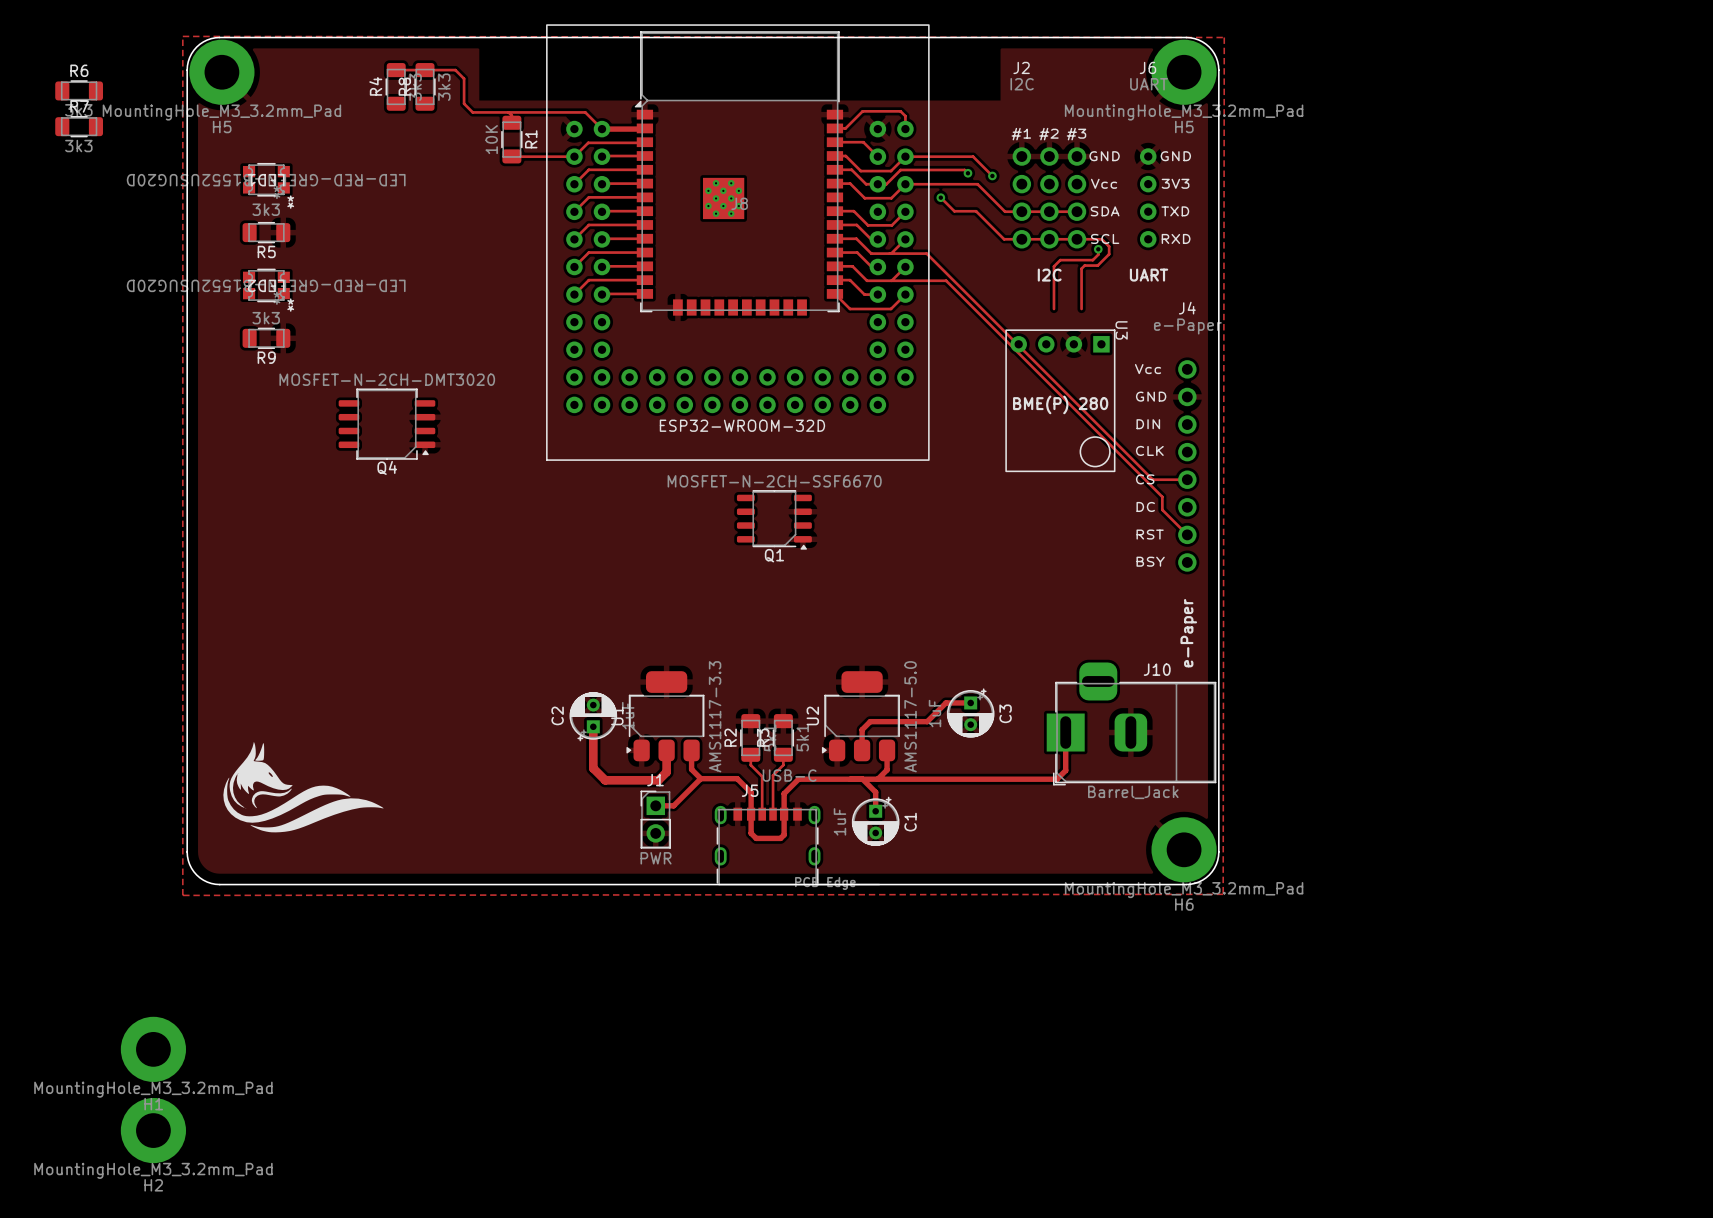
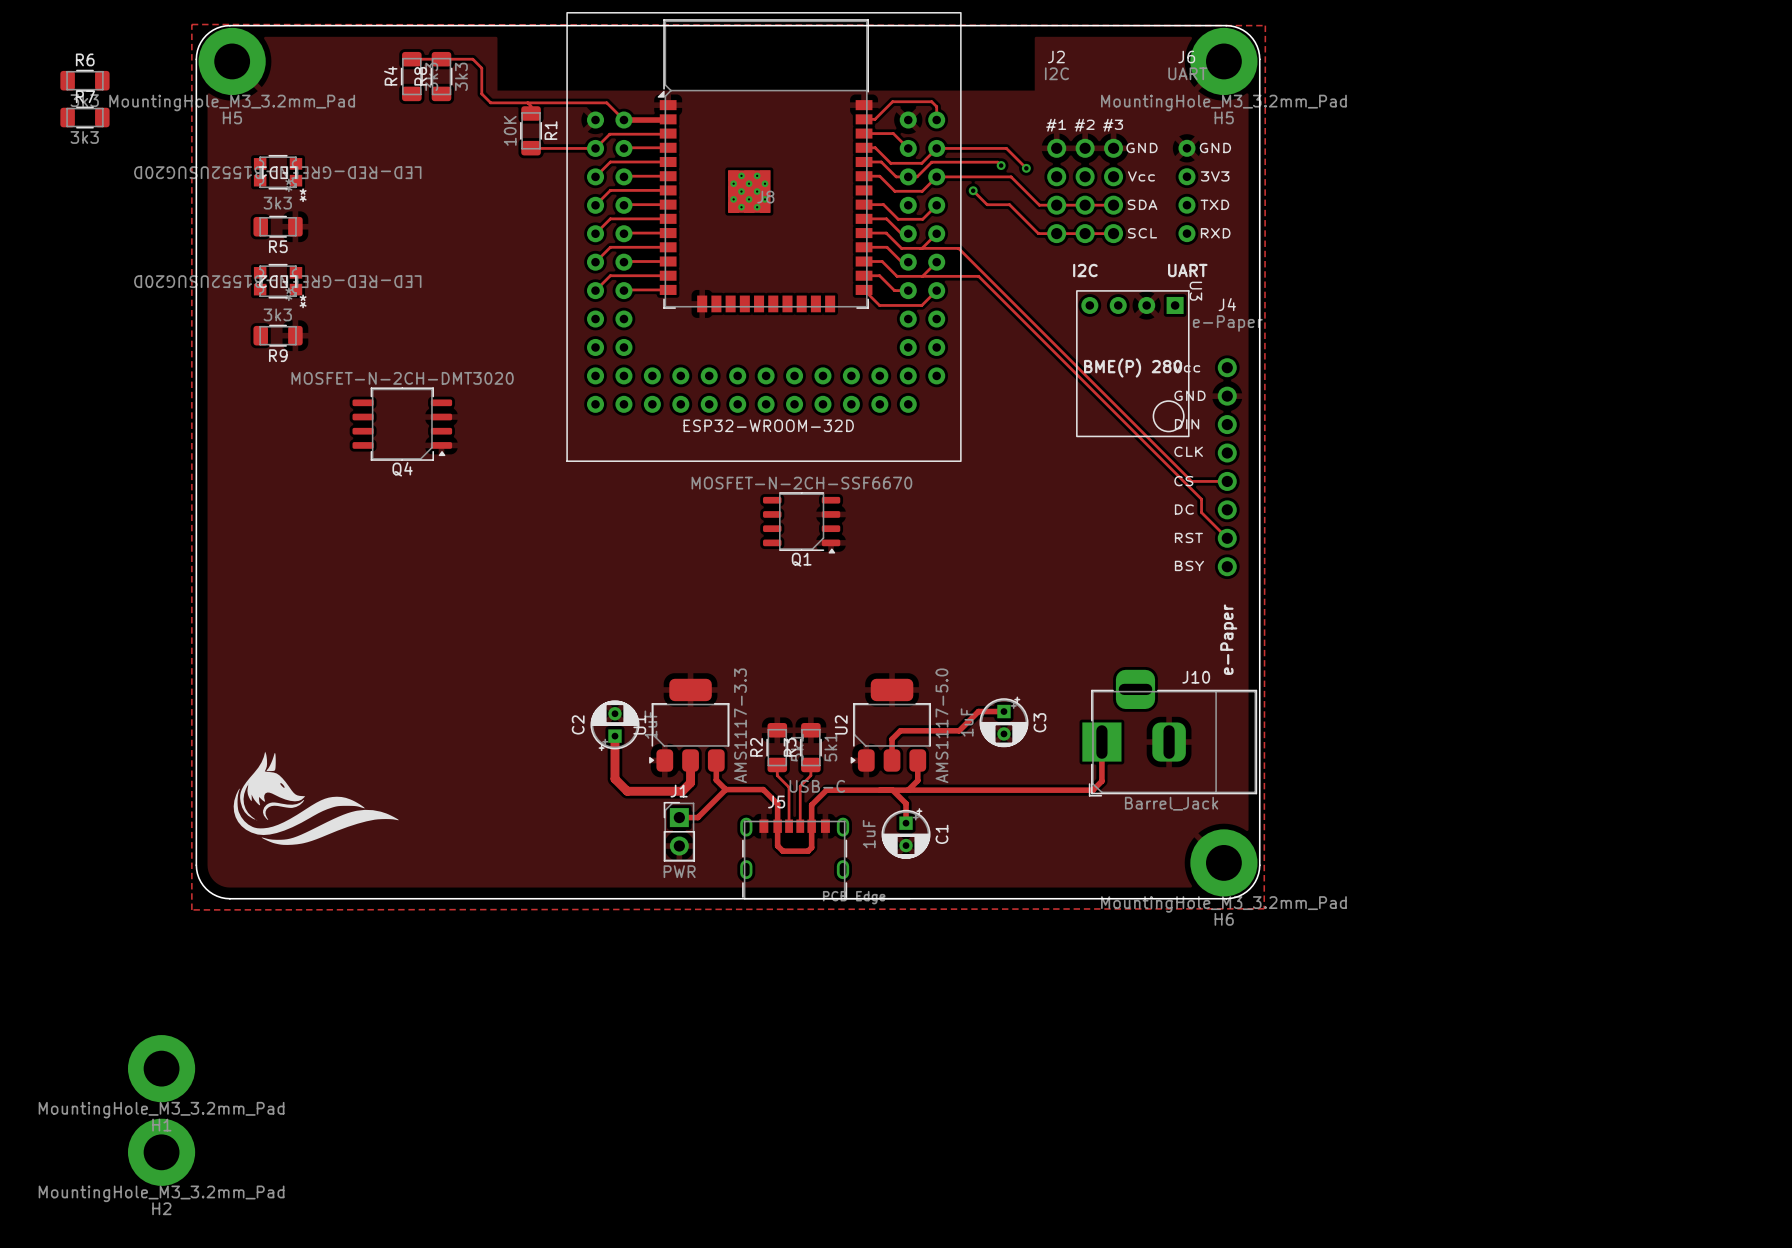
track: (1077, 239) (1101, 239) (1109, 246) (1109, 254) (1097, 265) (1084, 265) (1081, 268) (1081, 309) -> none
track: (1098, 249) (1098, 254) (1092, 260) (1060, 260) (1053, 266) (1053, 309) -> none
via: (1098, 249) -> none
U3 position: (1060, 400) -> (1132, 363)

